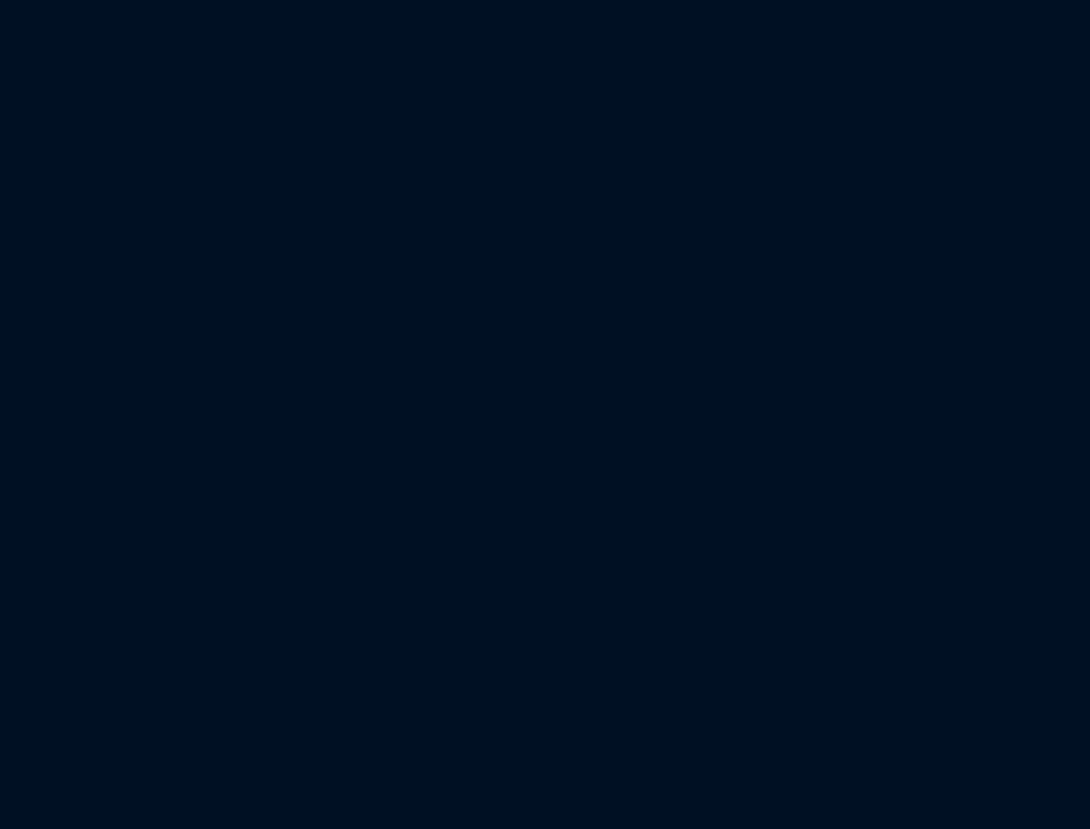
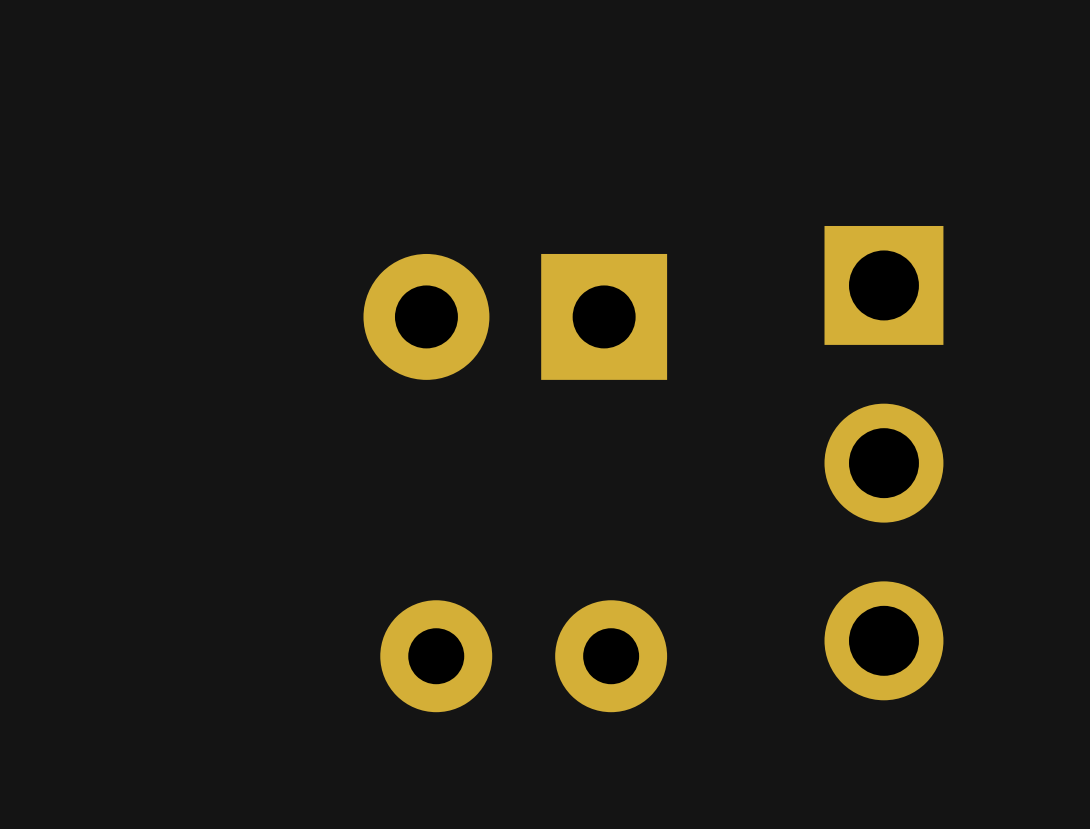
part: none -> (515, 316)
part: none -> (883, 463)
part: none -> (523, 656)

